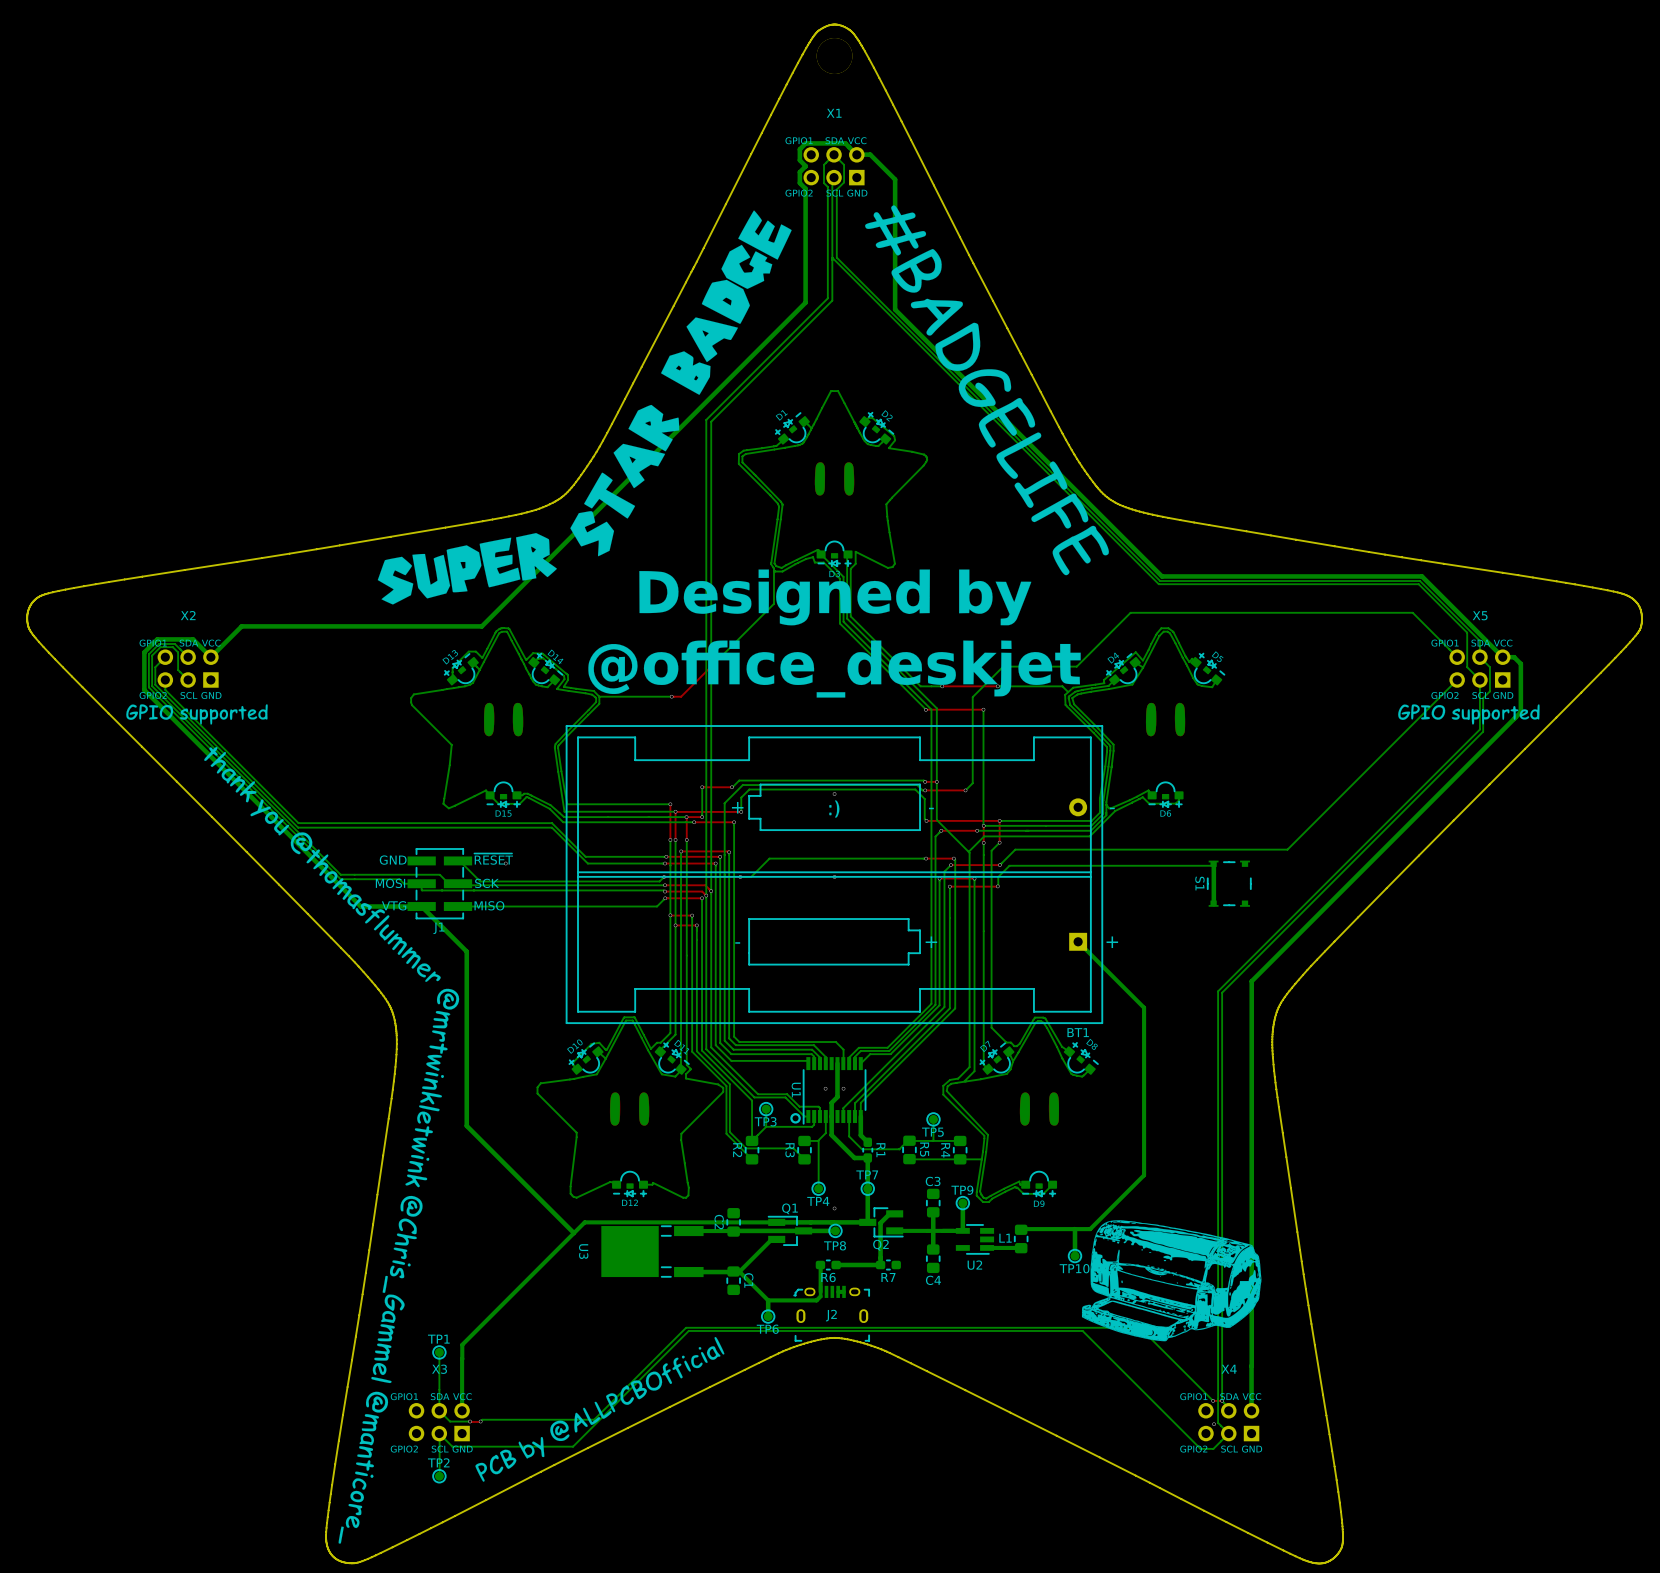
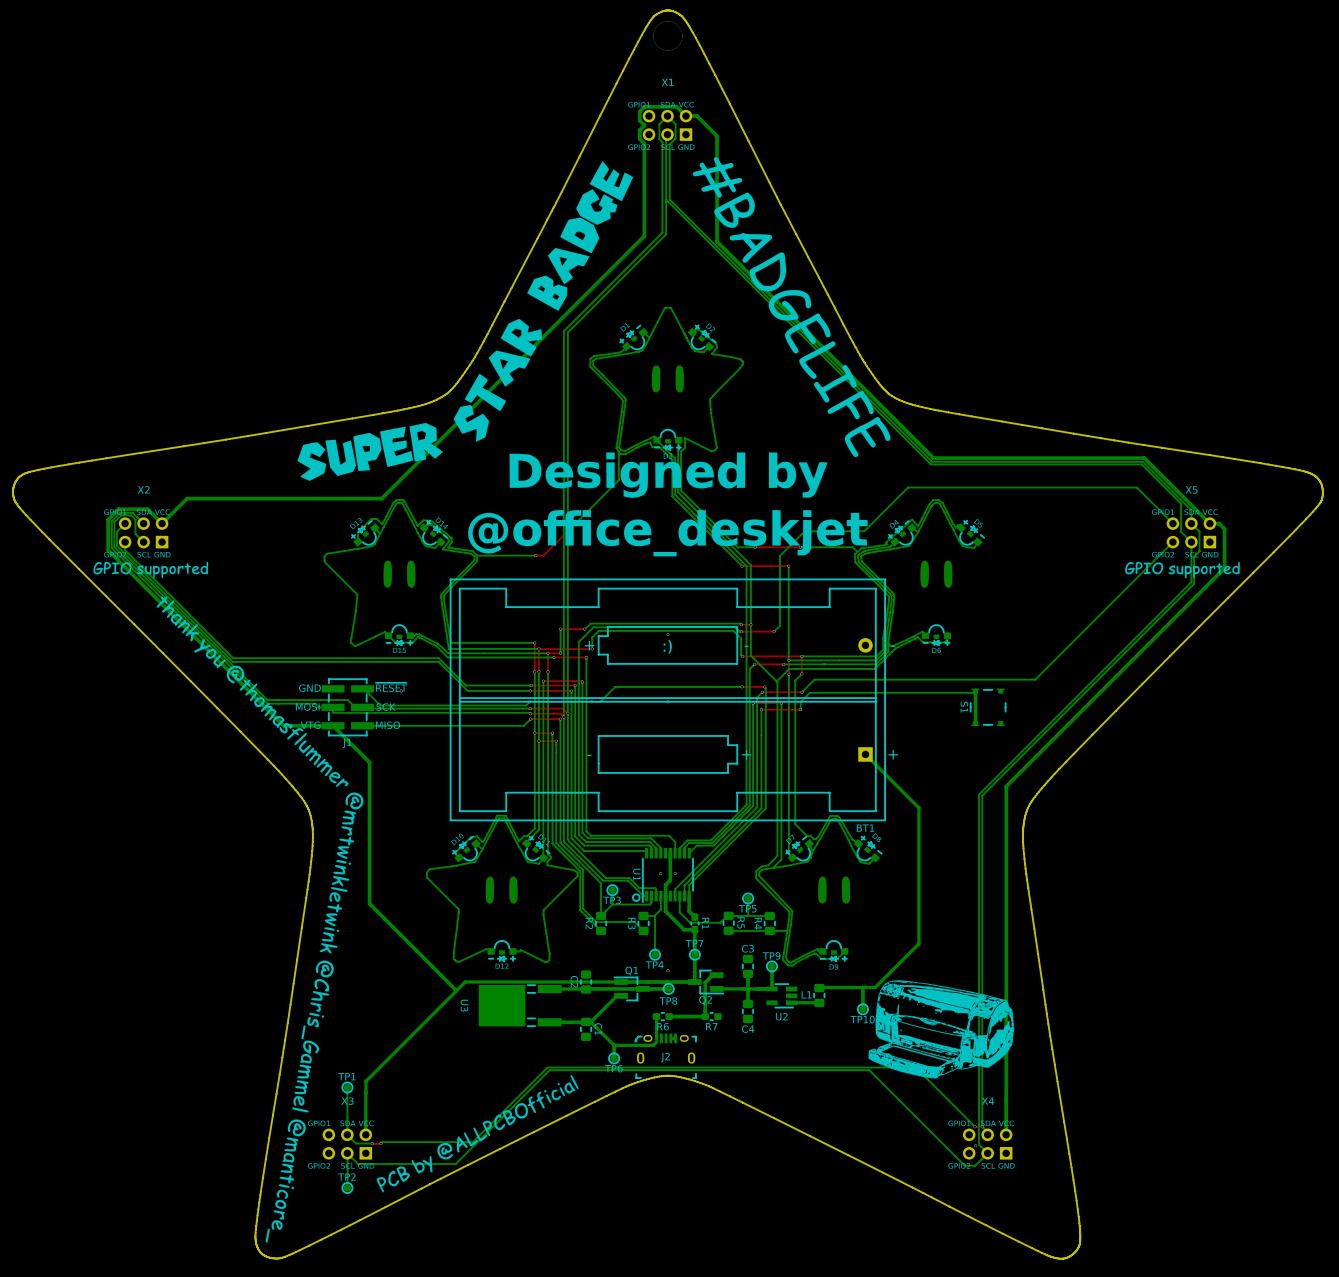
drawing shape: [126, 205, 1540, 1544] -> [93, 157, 1240, 1243]

